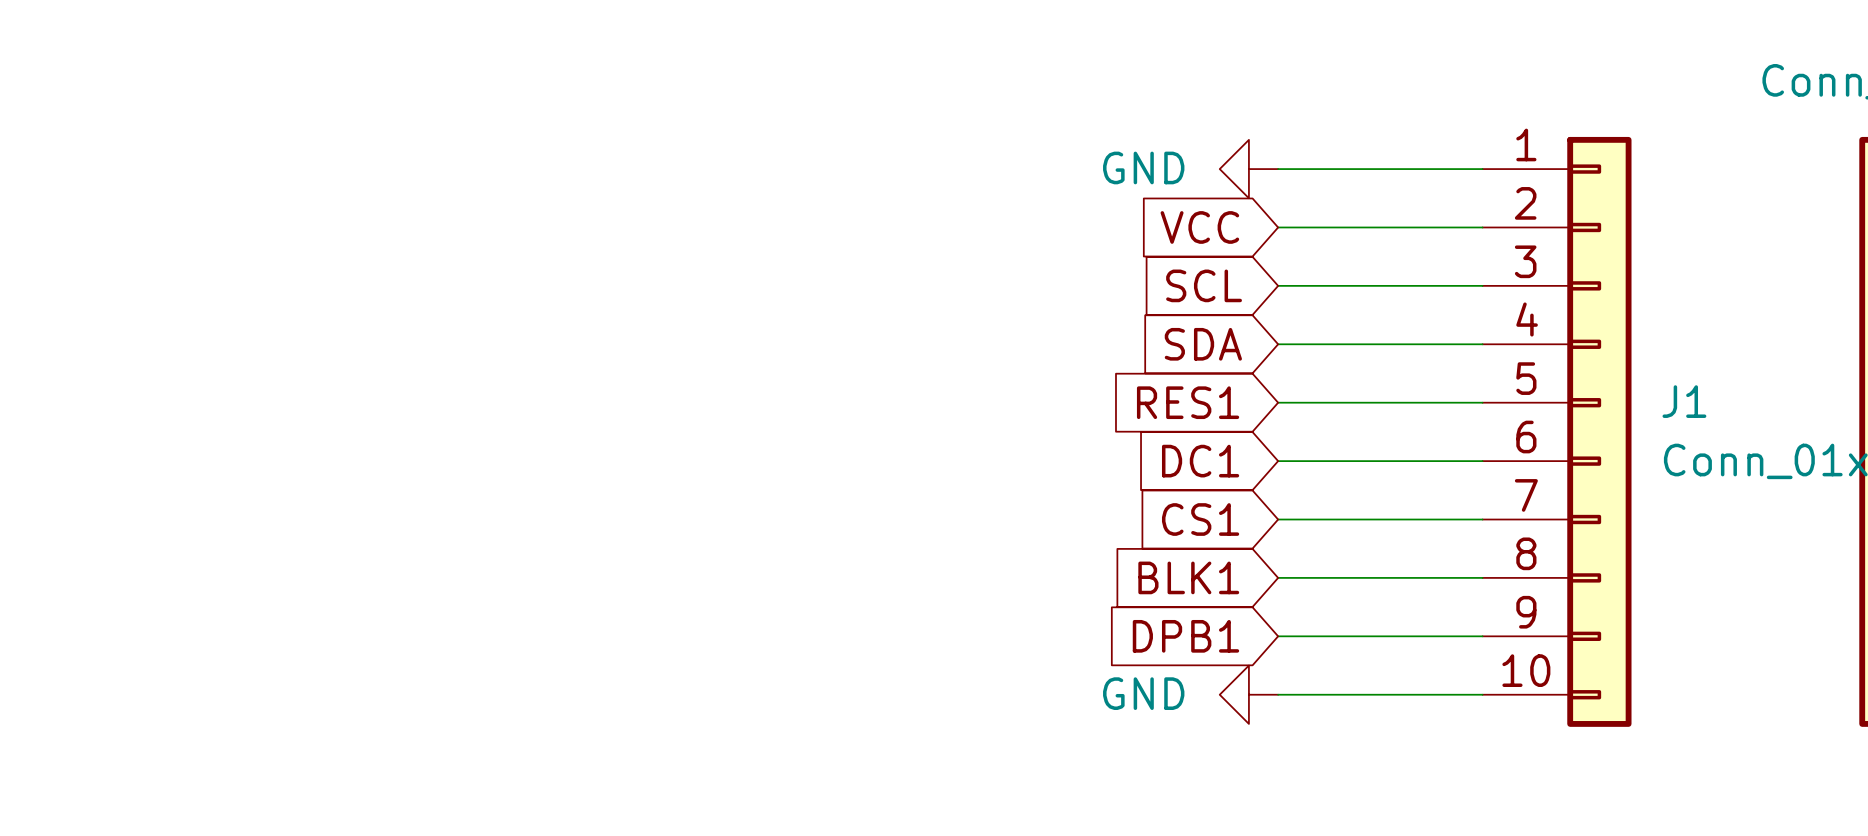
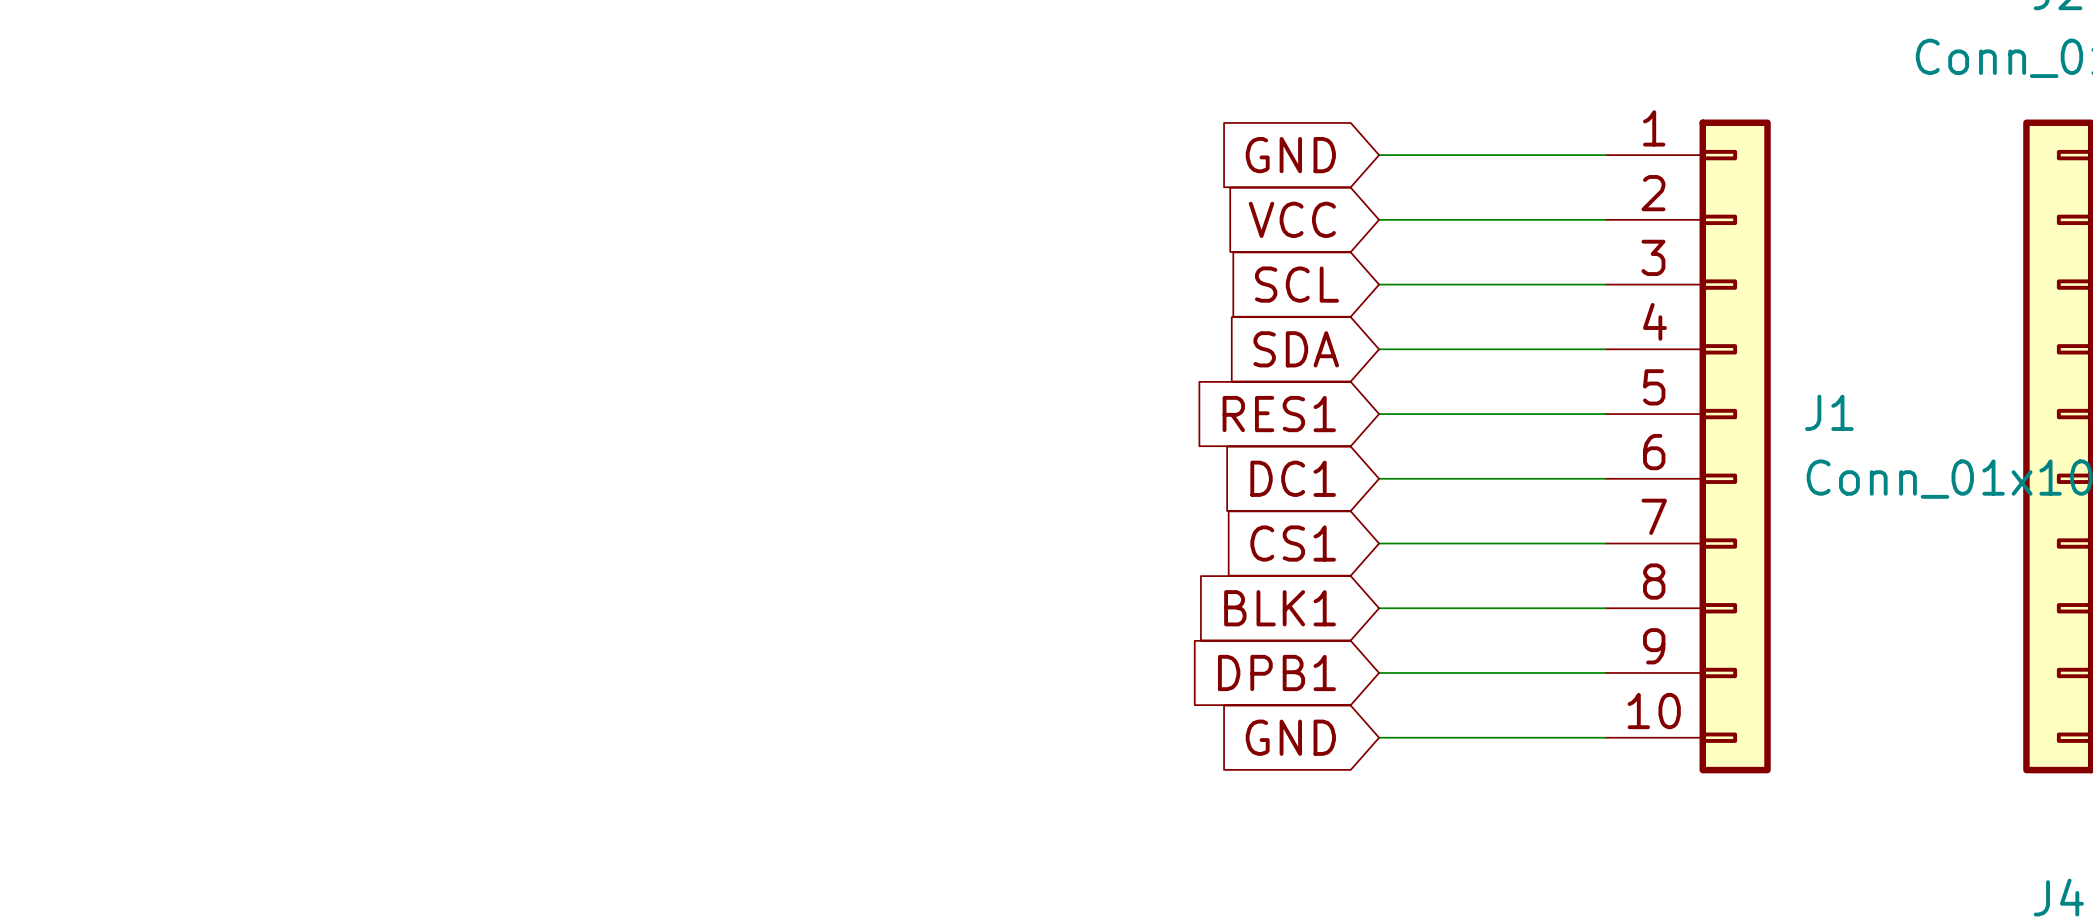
global label: none -> GND (1290, 155)
power symbol: GND (1248, 169) -> none
global label: none -> GND (1290, 737)
power symbol: GND (1248, 694) -> none

